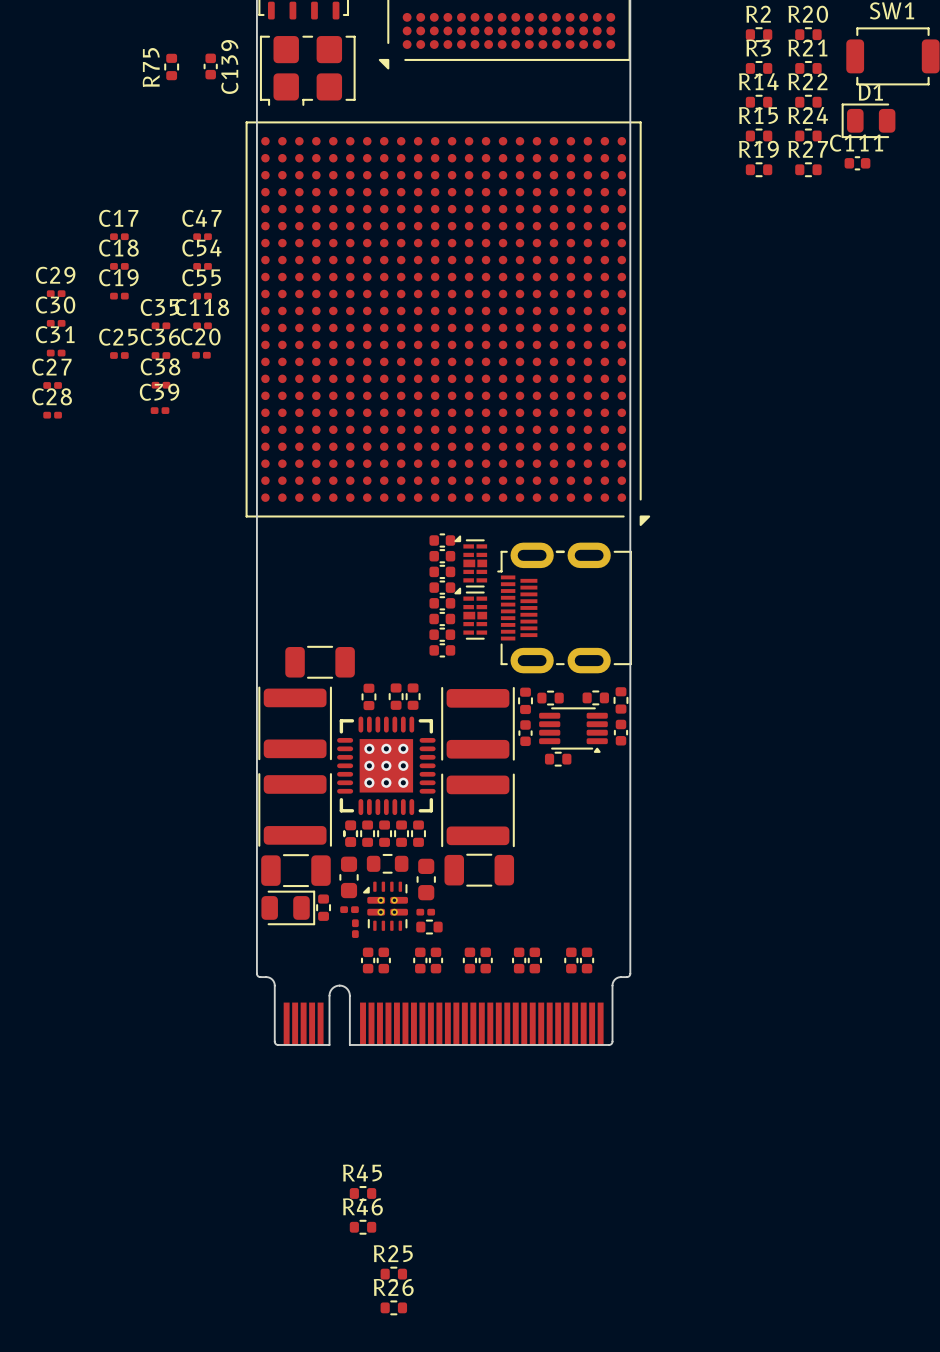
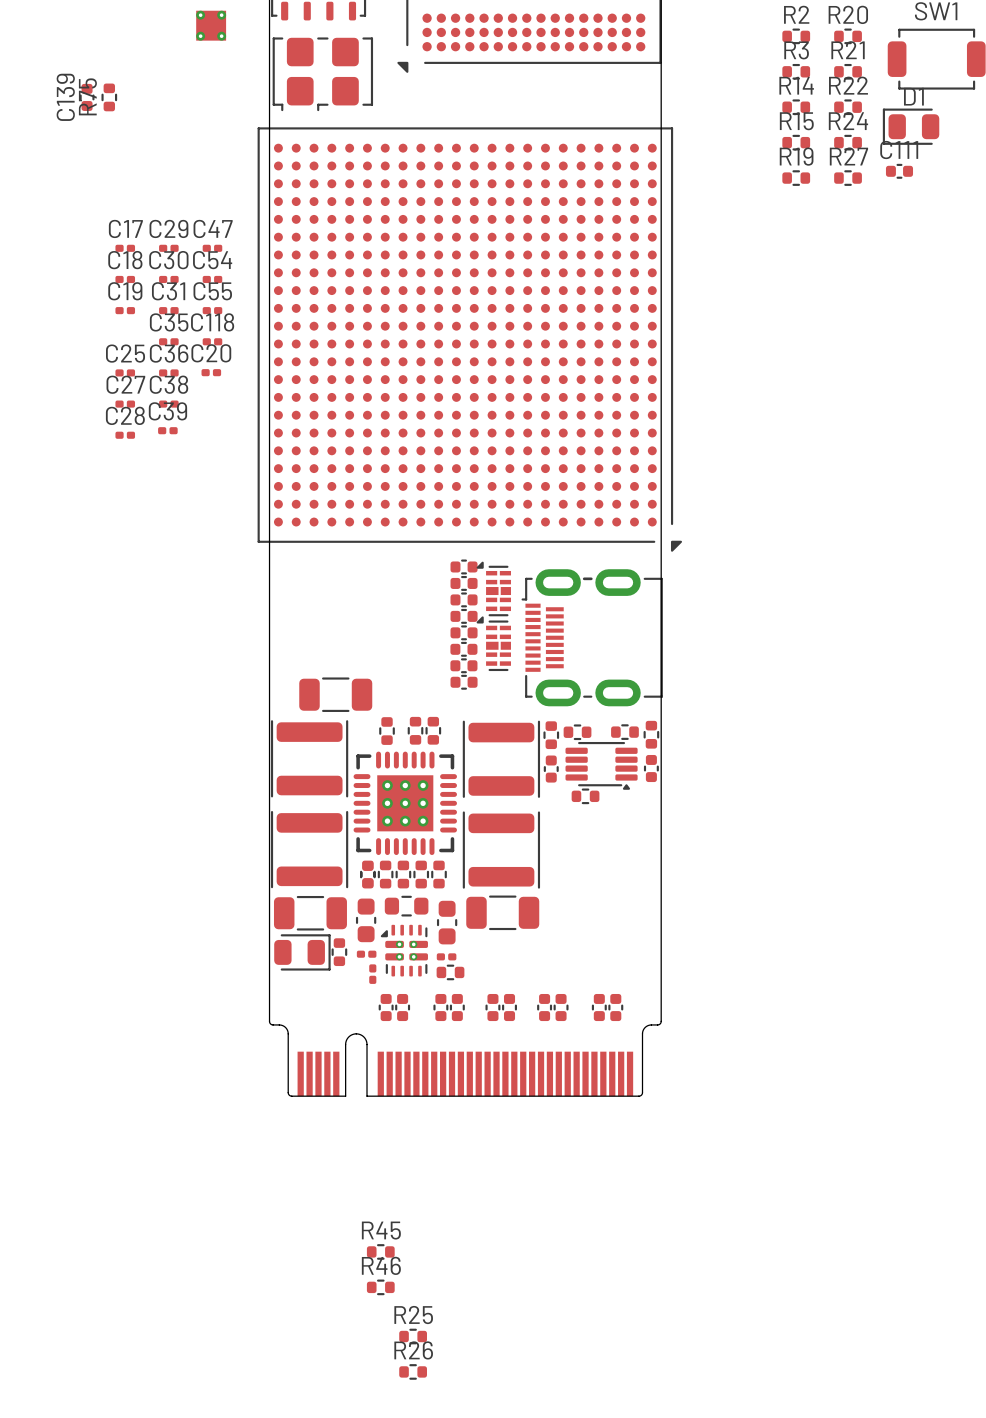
part: none -> (211, 25)
C139 position: (210, 66) -> (87, 97)
C139 name position: C139 (229, 66) -> C139 (65, 97)
R75 position: (171, 67) -> (109, 97)
C29 position: (56, 293) -> (168, 248)
C30 position: (56, 323) -> (168, 279)
C31 position: (56, 353) -> (168, 310)
C27 position: (52, 385) -> (125, 404)
C28 position: (52, 415) -> (125, 435)

